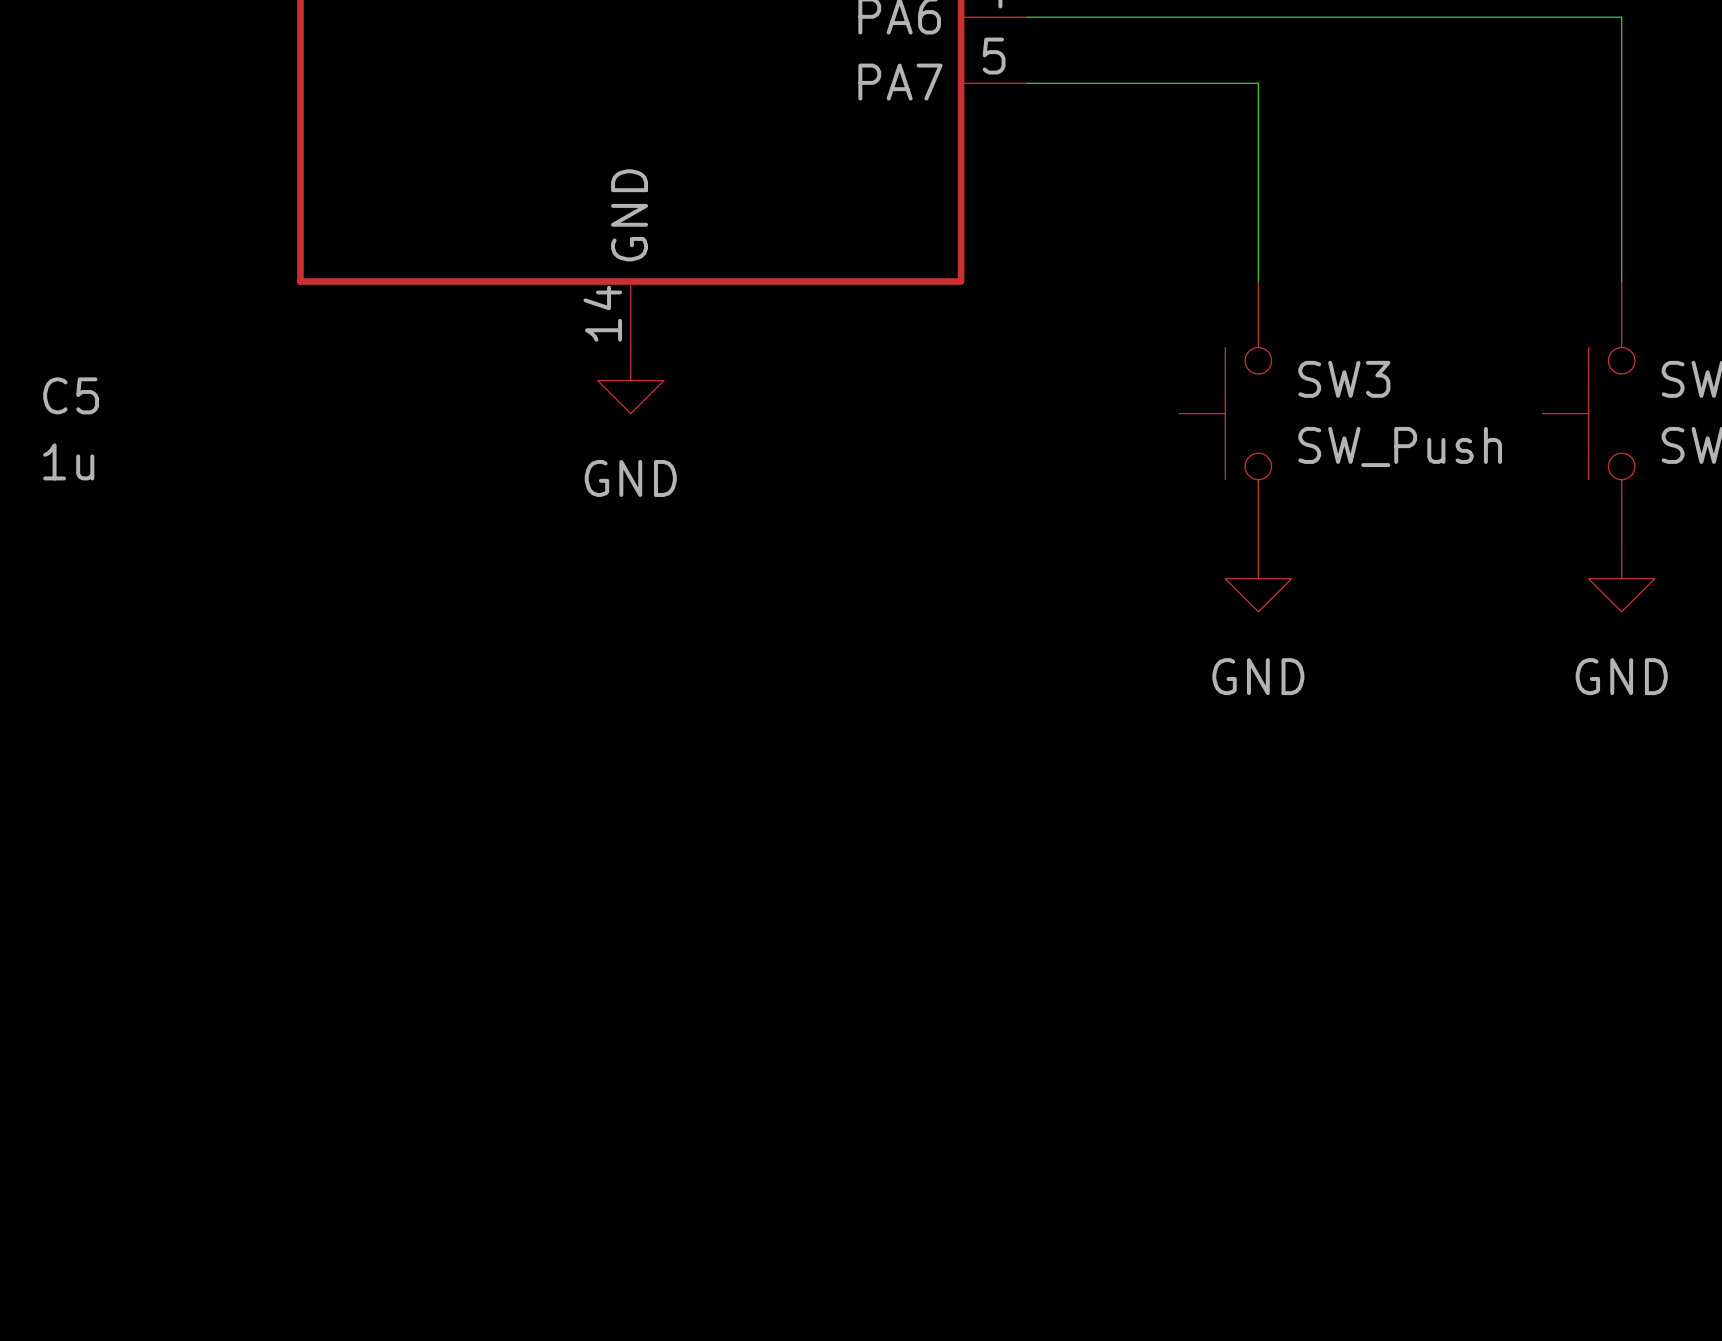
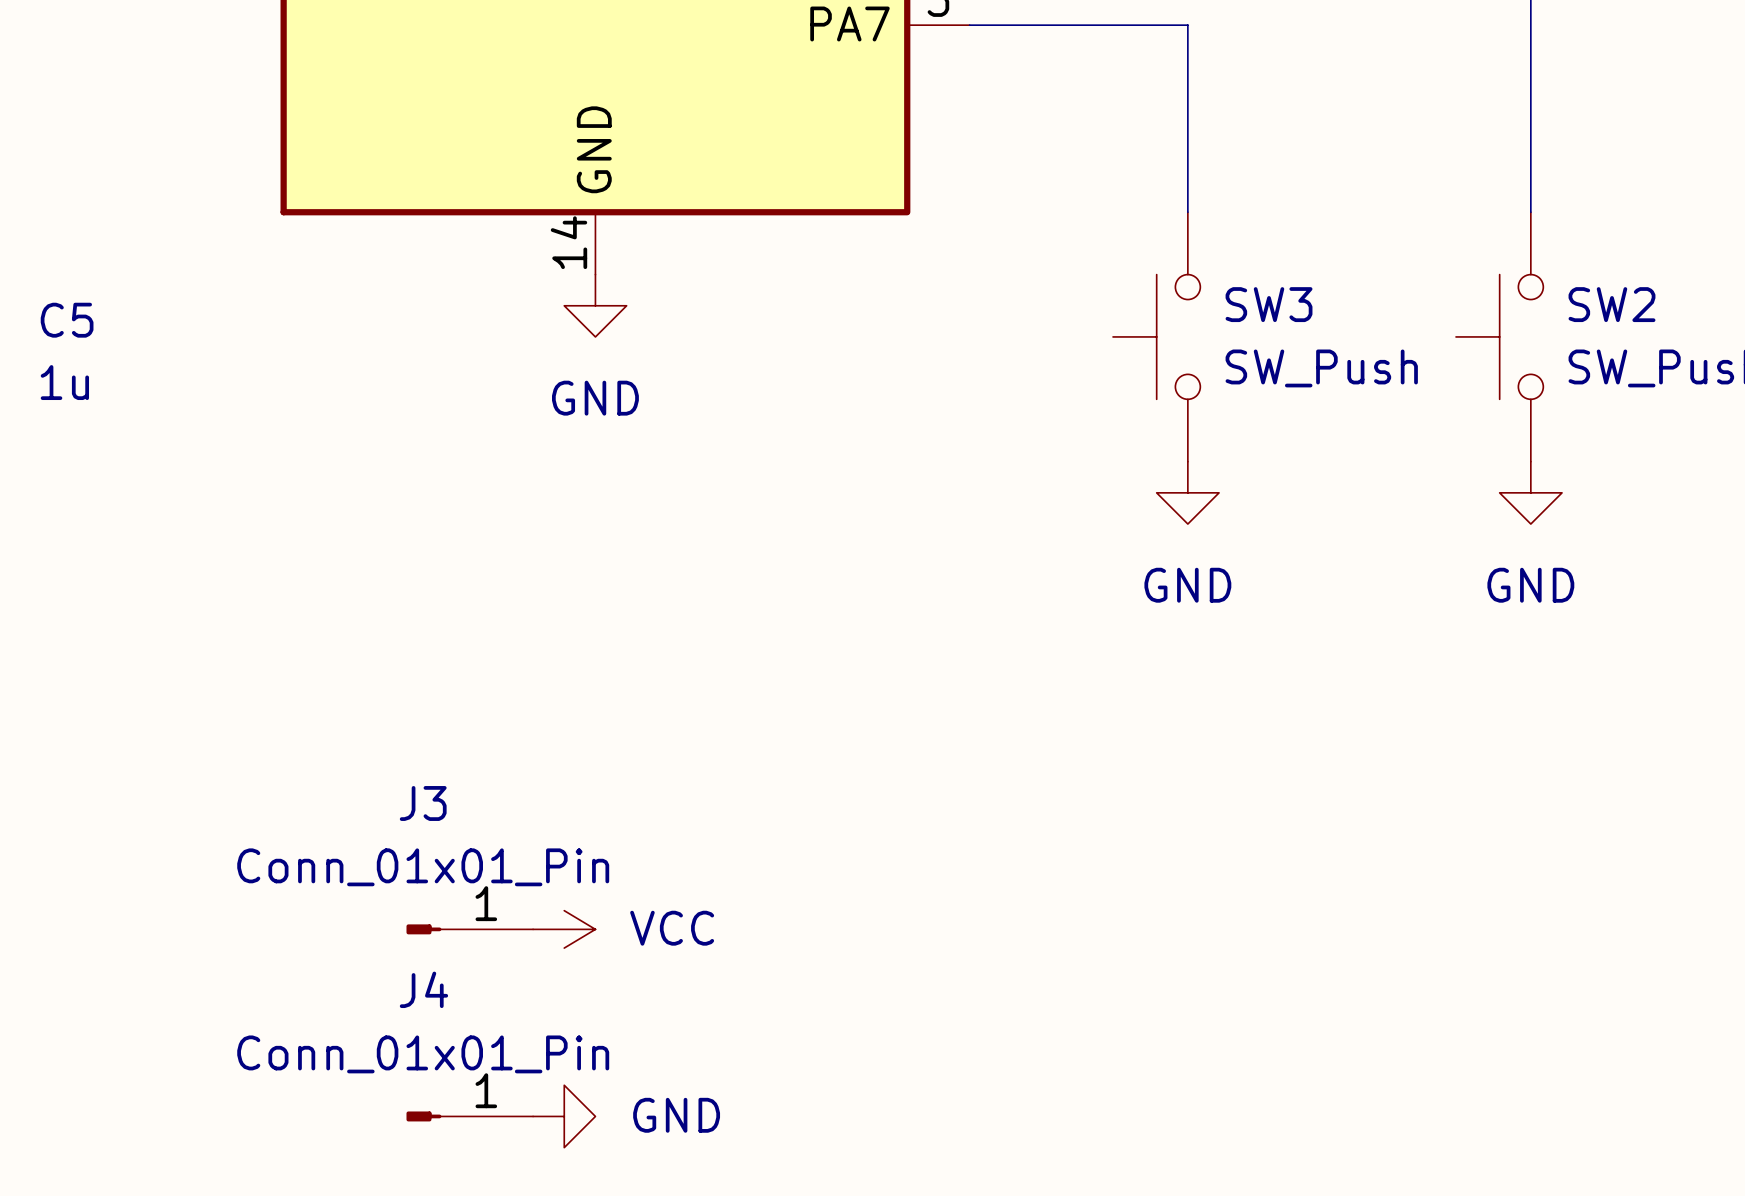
J3: none -> Conn_01x01_Pin (469, 929)
power symbol: none -> VCC (564, 929)
J4: none -> Conn_01x01_Pin (469, 1116)
power symbol: none -> GND (564, 1116)

